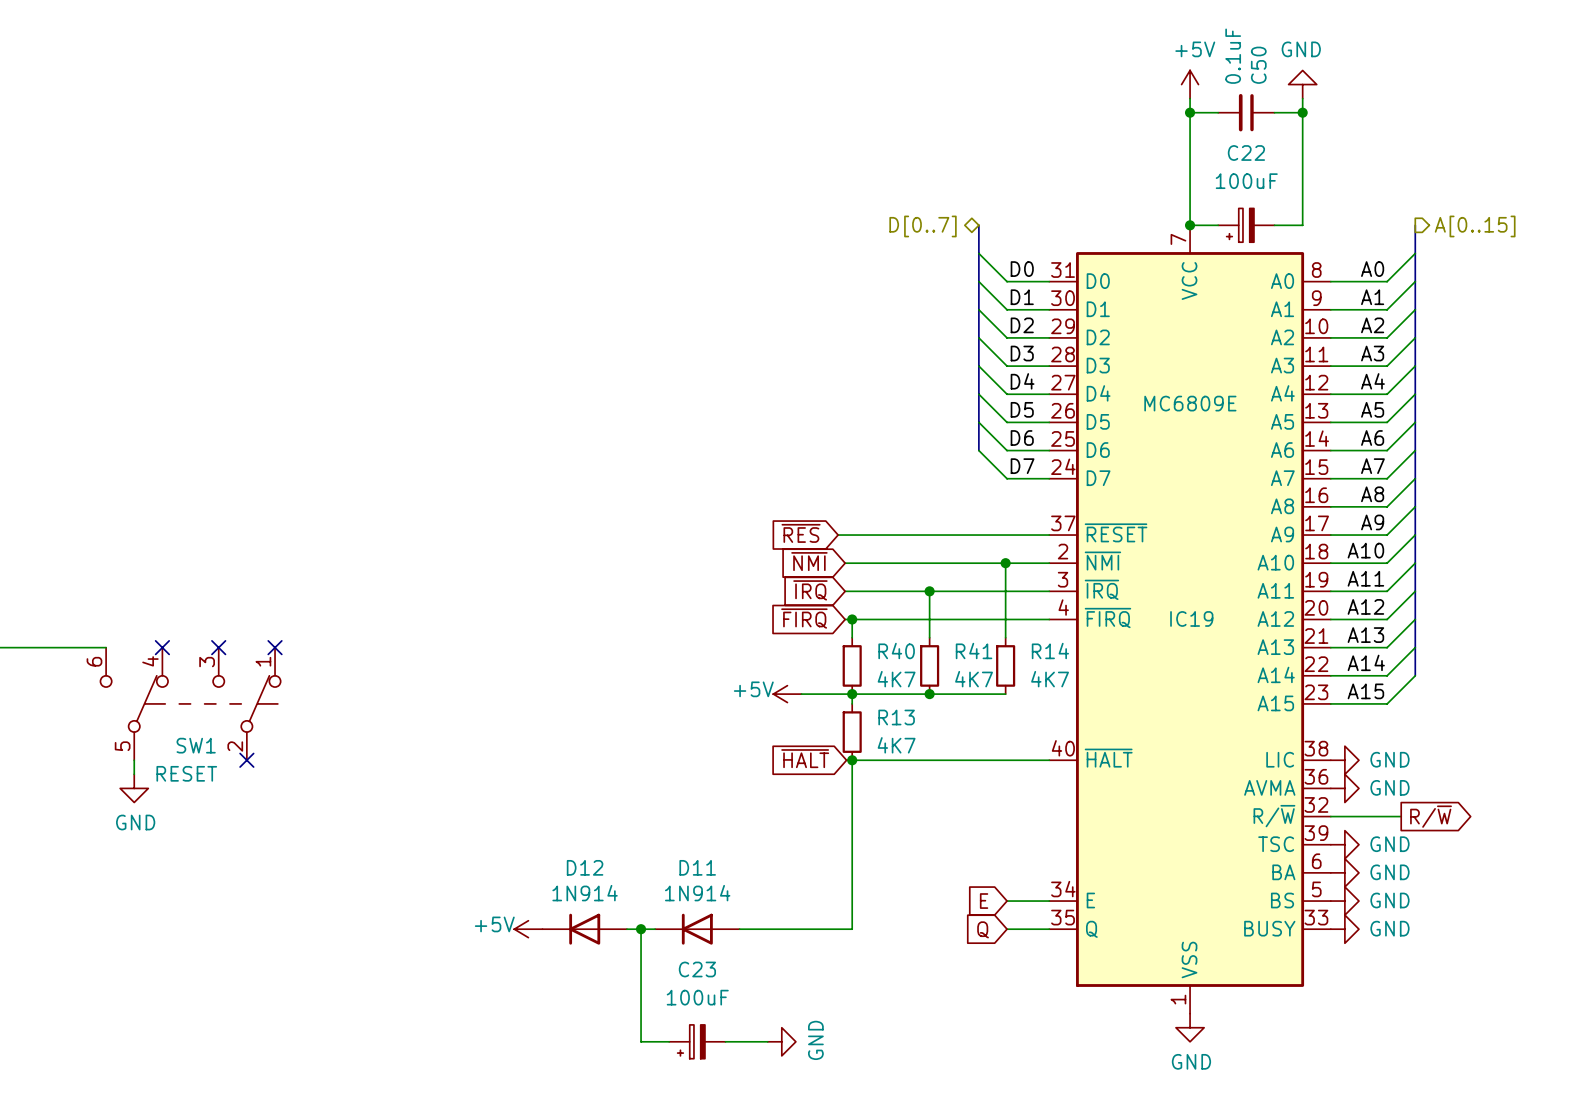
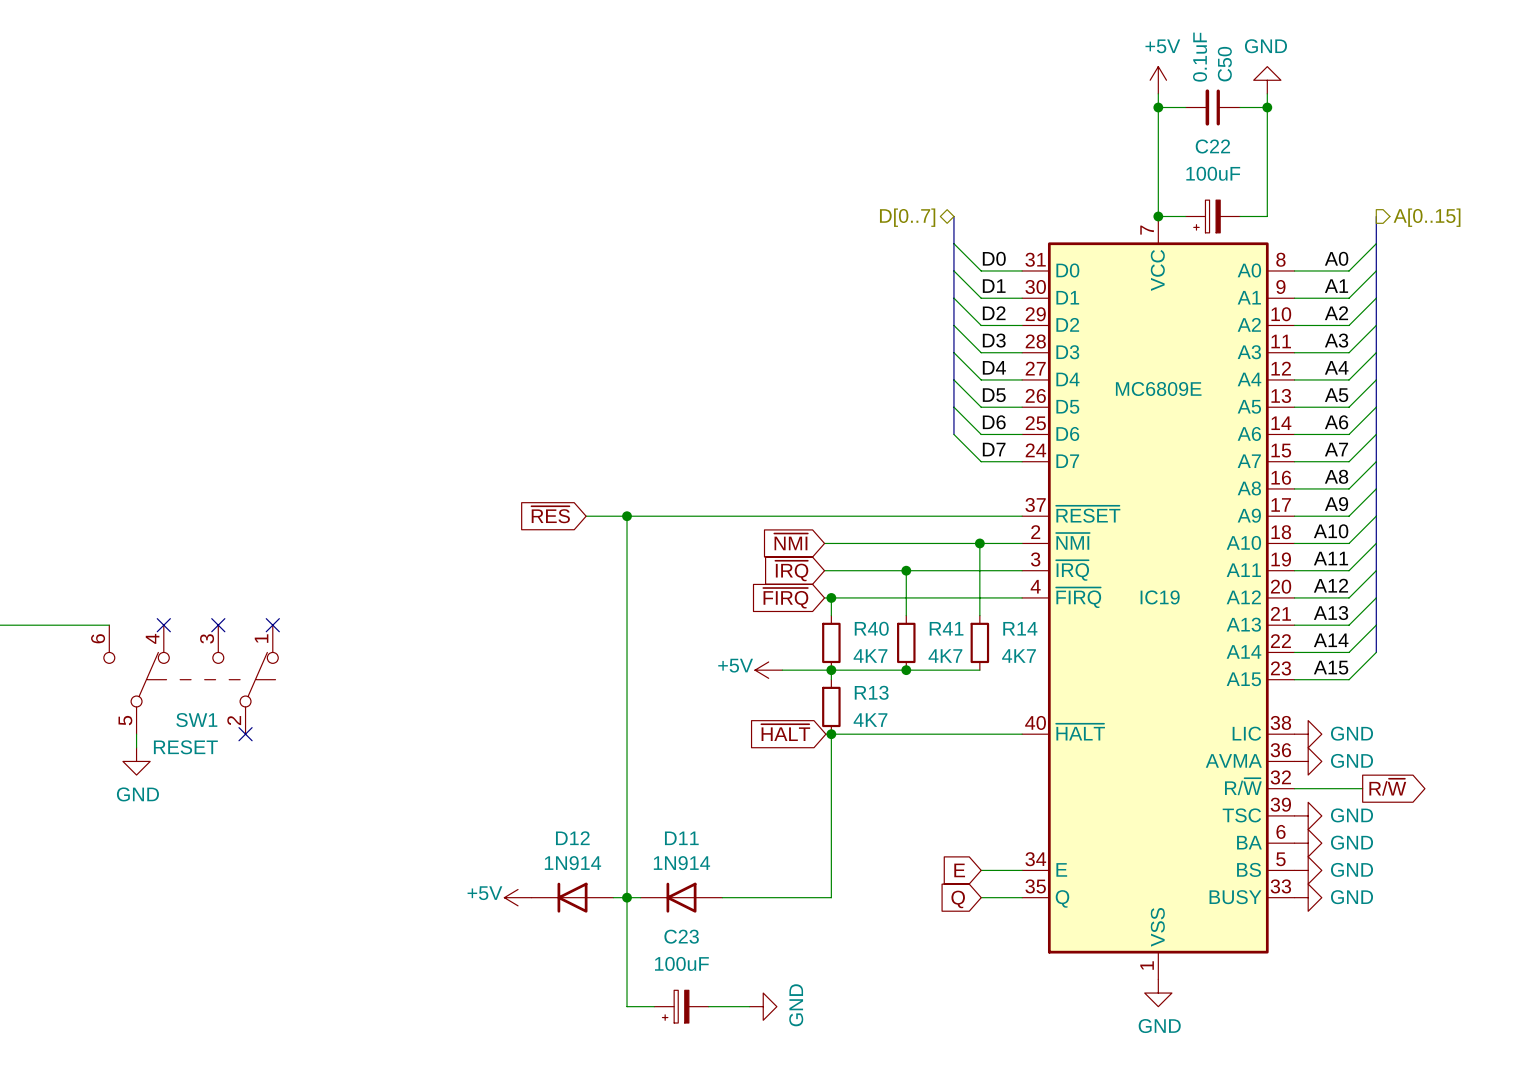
global label position: ~{RES} (801, 533) -> ~{RES} (550, 514)
wire: none -> (586, 516) (817, 516)
wire: none -> (627, 516) (627, 897)
junction: none -> (627, 516)

